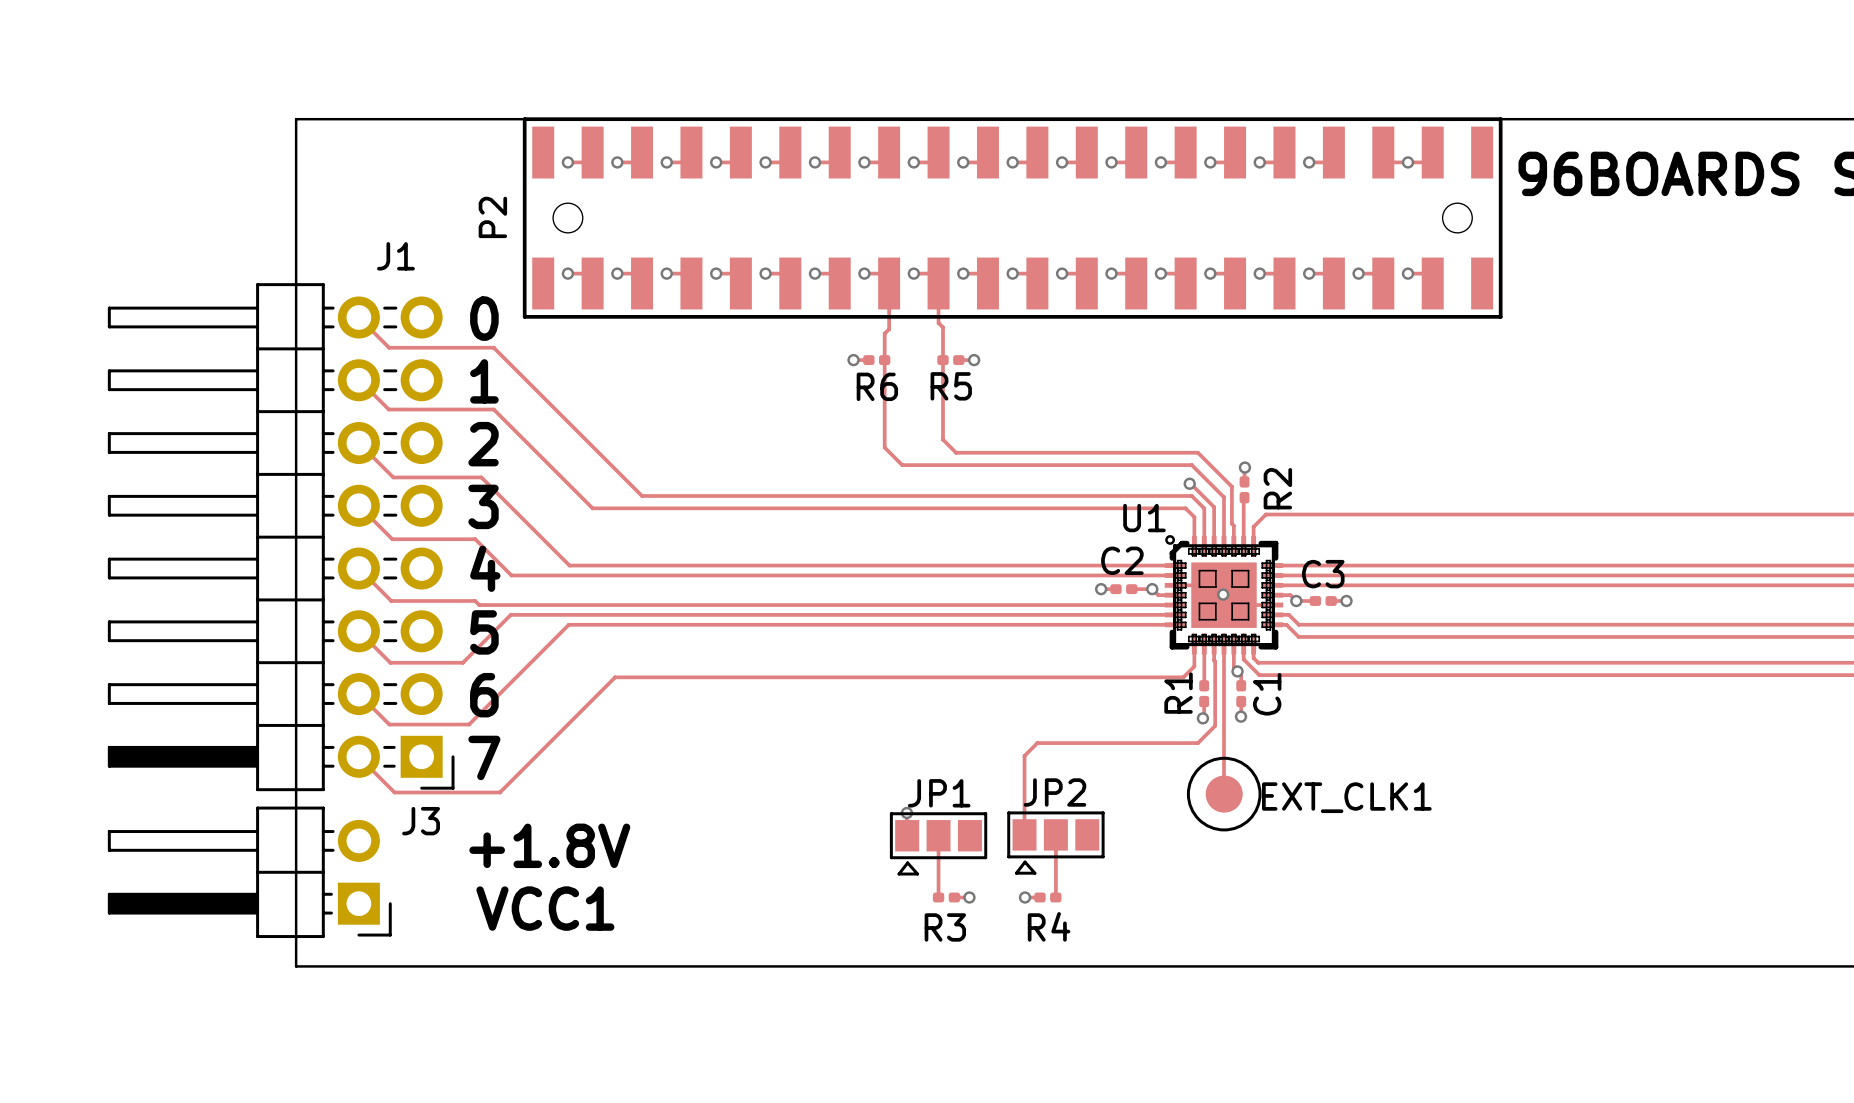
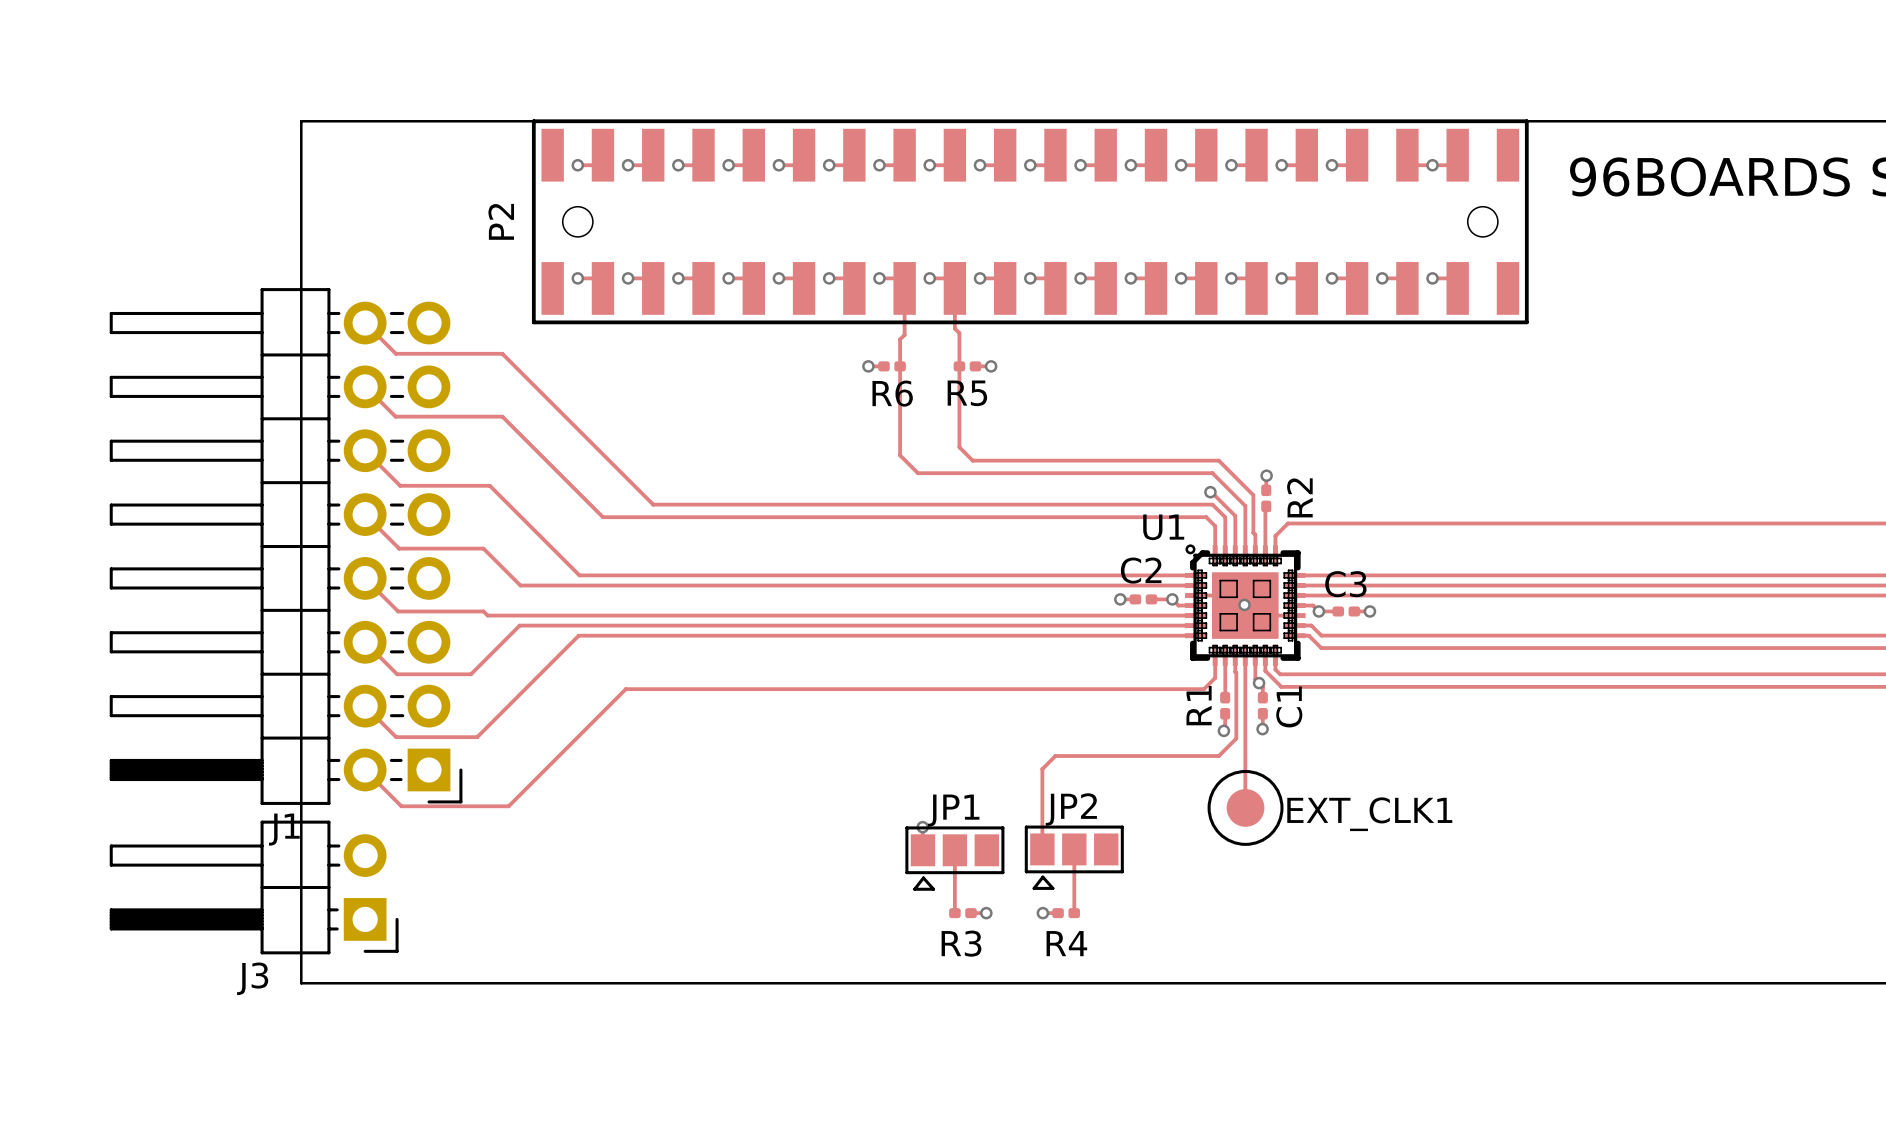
J1 name position: J1 (395, 256) -> J1 (284, 829)
text: 0 (484, 318) -> none
text: 1 (484, 381) -> none
text: 2 (483, 444) -> none
text: 3 (483, 506) -> none
text: 4 (485, 568) -> none
text: 5 (484, 632) -> none
text: 6 (484, 695) -> none
text: 7 (484, 757) -> none
J3 name position: J3 (421, 821) -> J3 (252, 978)
text: +1.8V (549, 845) -> none
text: VCC1 (545, 908) -> none

